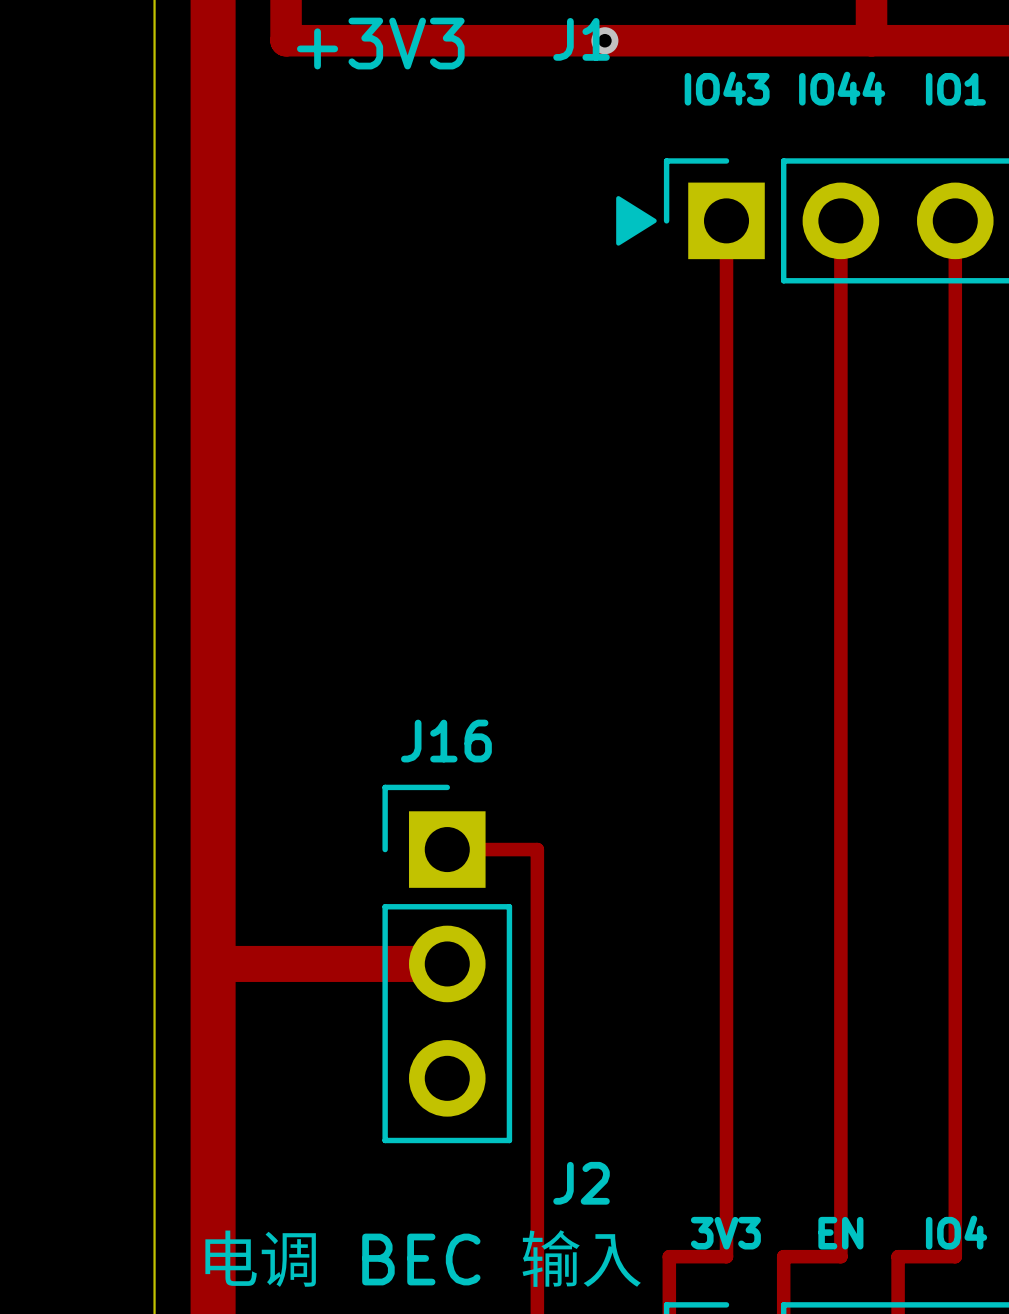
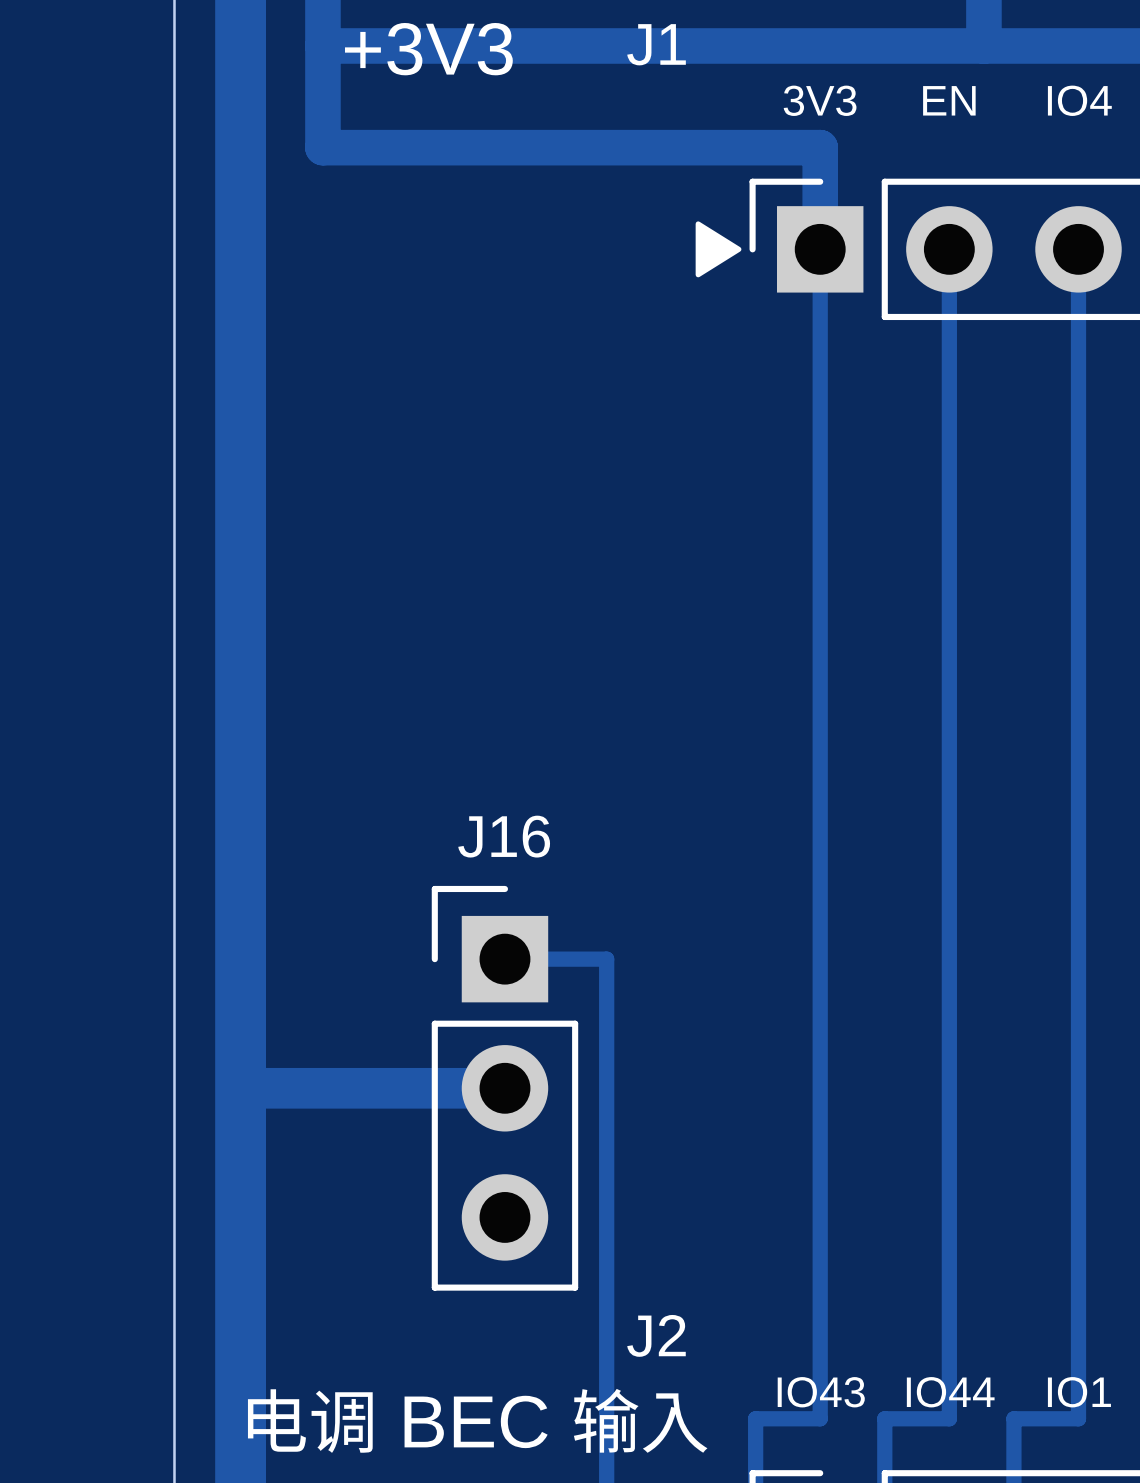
track: none -> (322, 45) (322, 147) (820, 147) (820, 249)
via: (604, 40) -> none
text: IO43 (727, 88) -> 3V3 (820, 100)
text: IO44 (842, 88) -> EN (949, 100)
text: IO1 (955, 89) -> IO4 (1079, 100)
text: IO4 (956, 1232) -> IO1 (1079, 1392)
text: 3V3 (725, 1233) -> IO43 (821, 1392)
text: EN (840, 1233) -> IO44 (950, 1392)

